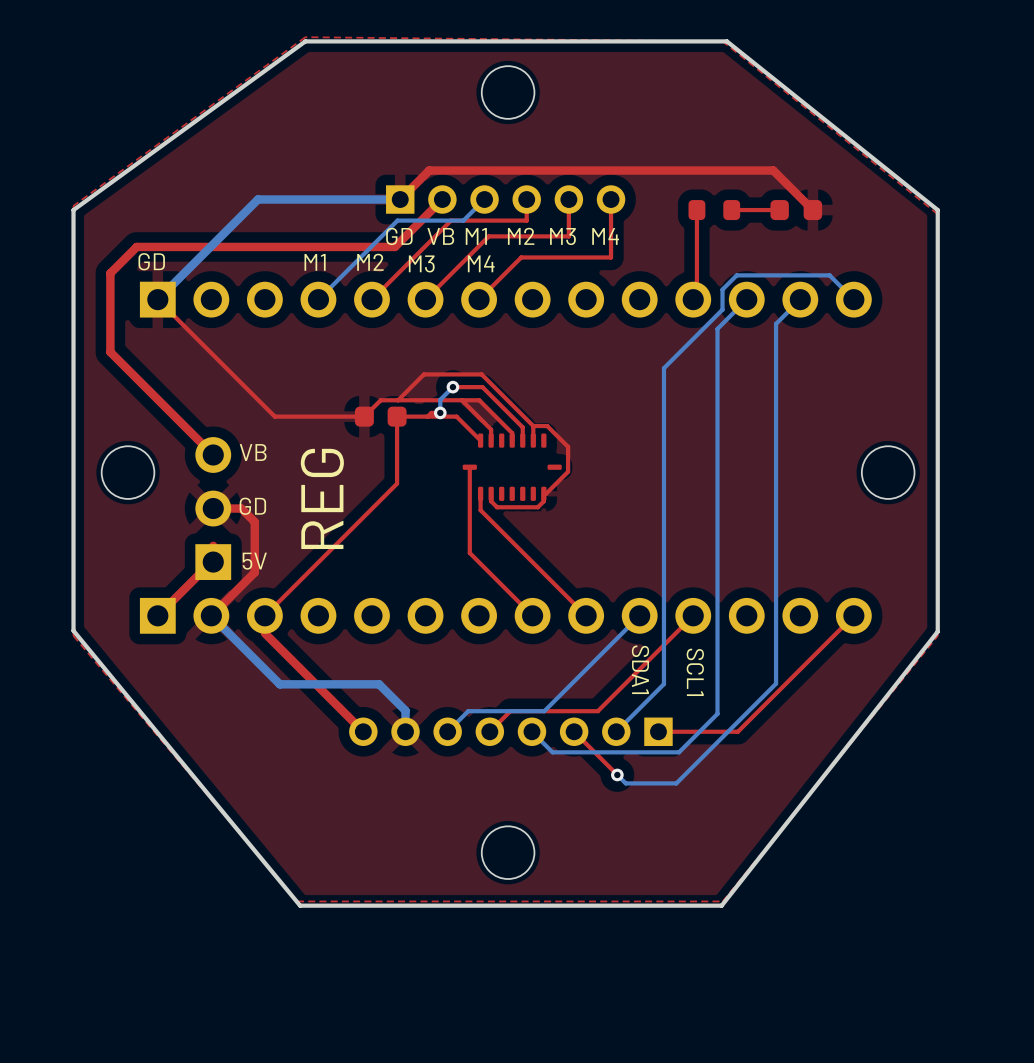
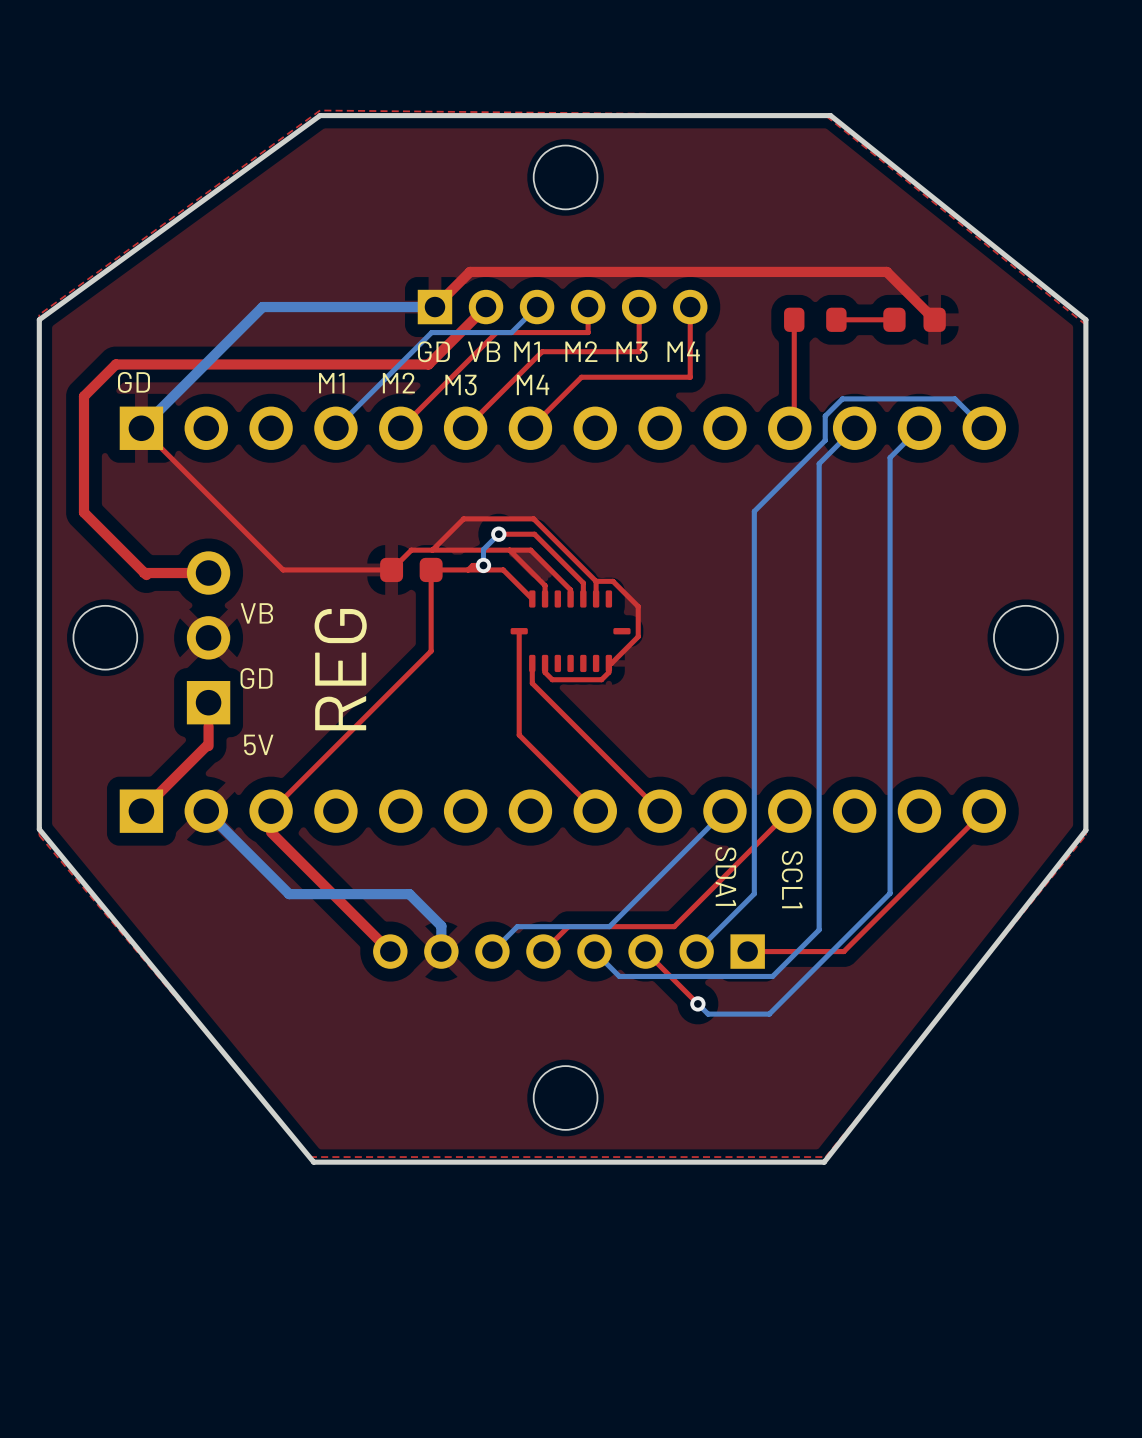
top track: (110, 352) (213, 454) -> (83, 491) (83, 512) (146, 575)
top track: none -> (208, 573) (144, 573)
top track: (213, 508) (241, 508) (254, 522) (254, 572) (211, 615) -> none
part position: (213, 508) -> (208, 637)

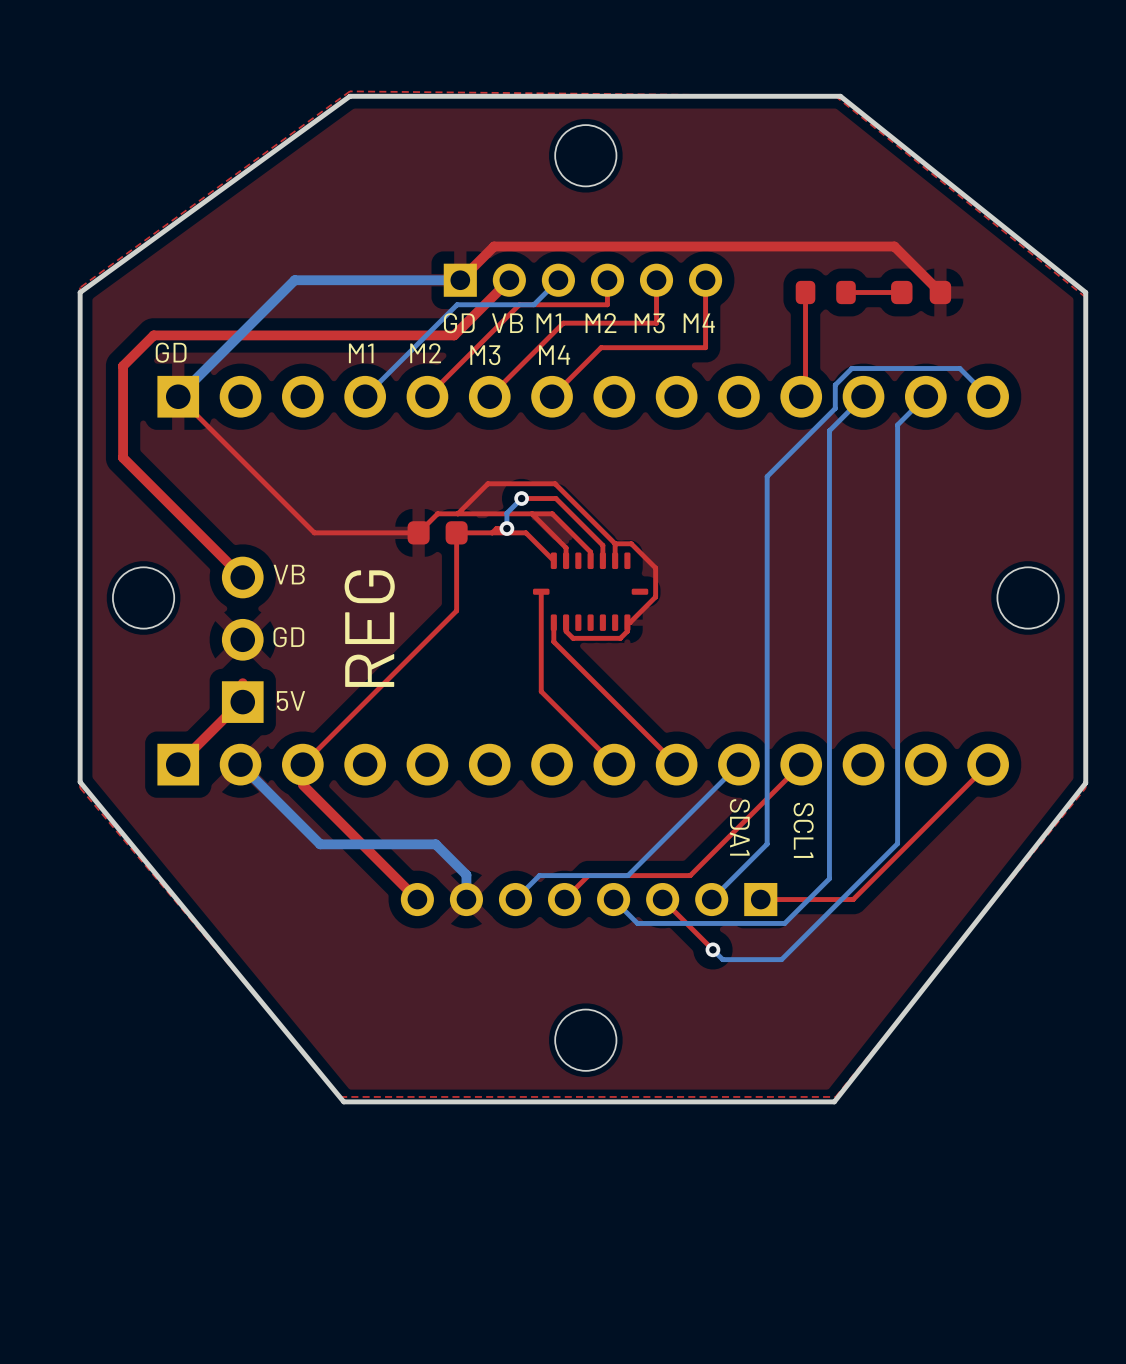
top track: (83, 491) (83, 512) (146, 575) -> (123, 457) (242, 577)
top track: (208, 573) (144, 573) -> none
part position: (208, 637) -> (242, 639)

